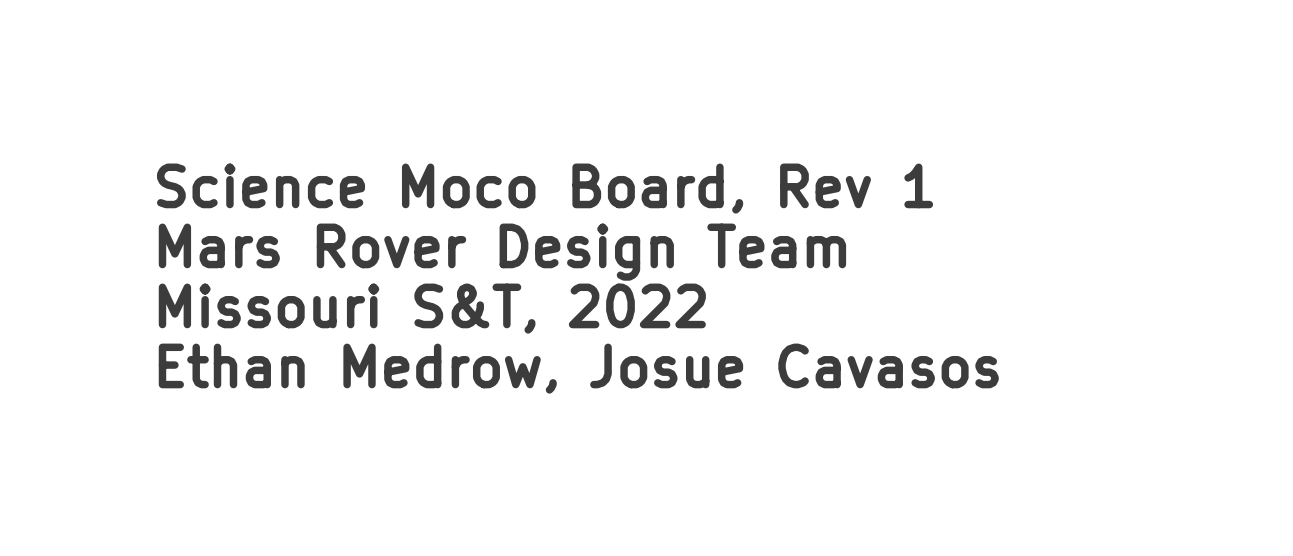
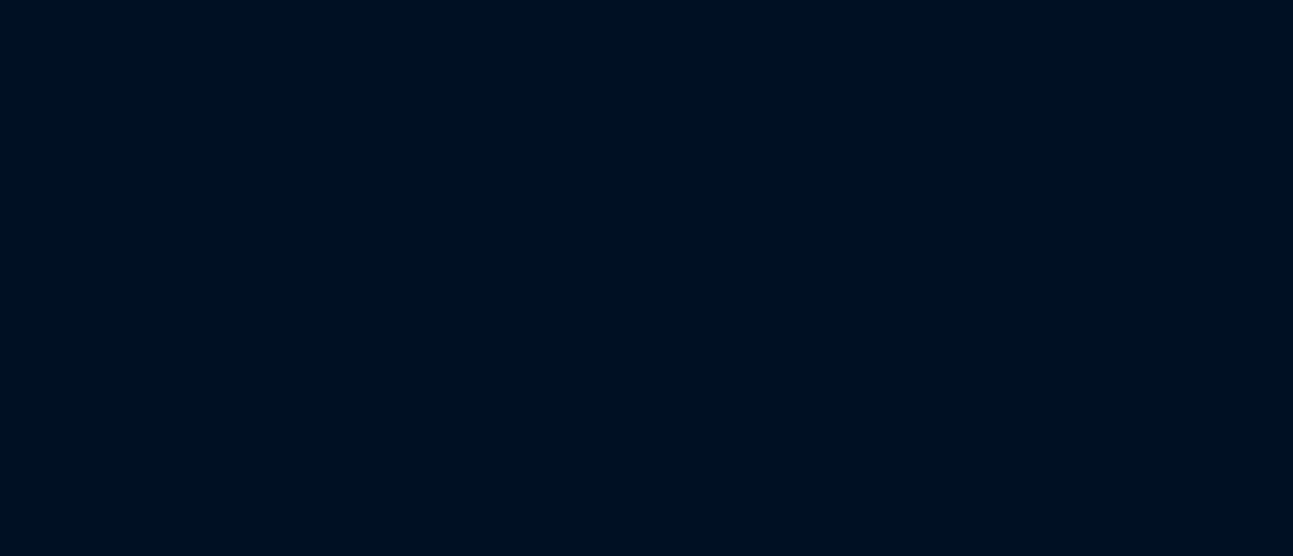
text: Science Moco Board, Rev 1 (545, 188) -> none
text: Mars Rover Design Team (502, 252) -> none
text: Missouri S&T, 2022 (432, 308) -> none
text: Ethan Medrow, Josue Cavasos (578, 368) -> none

